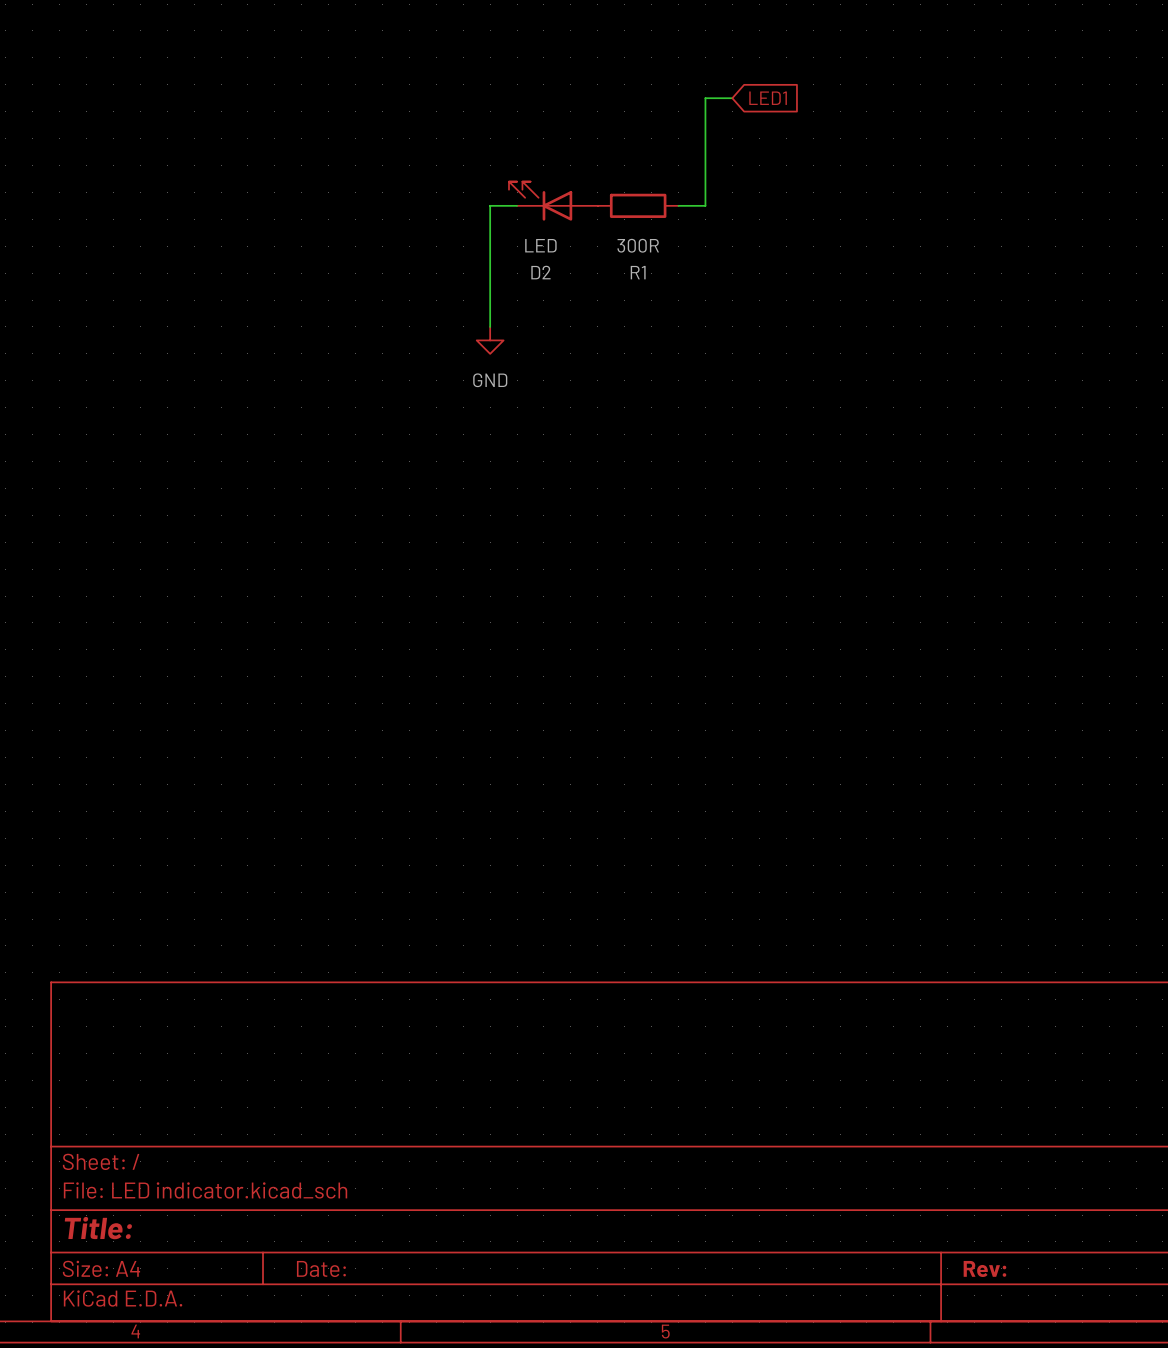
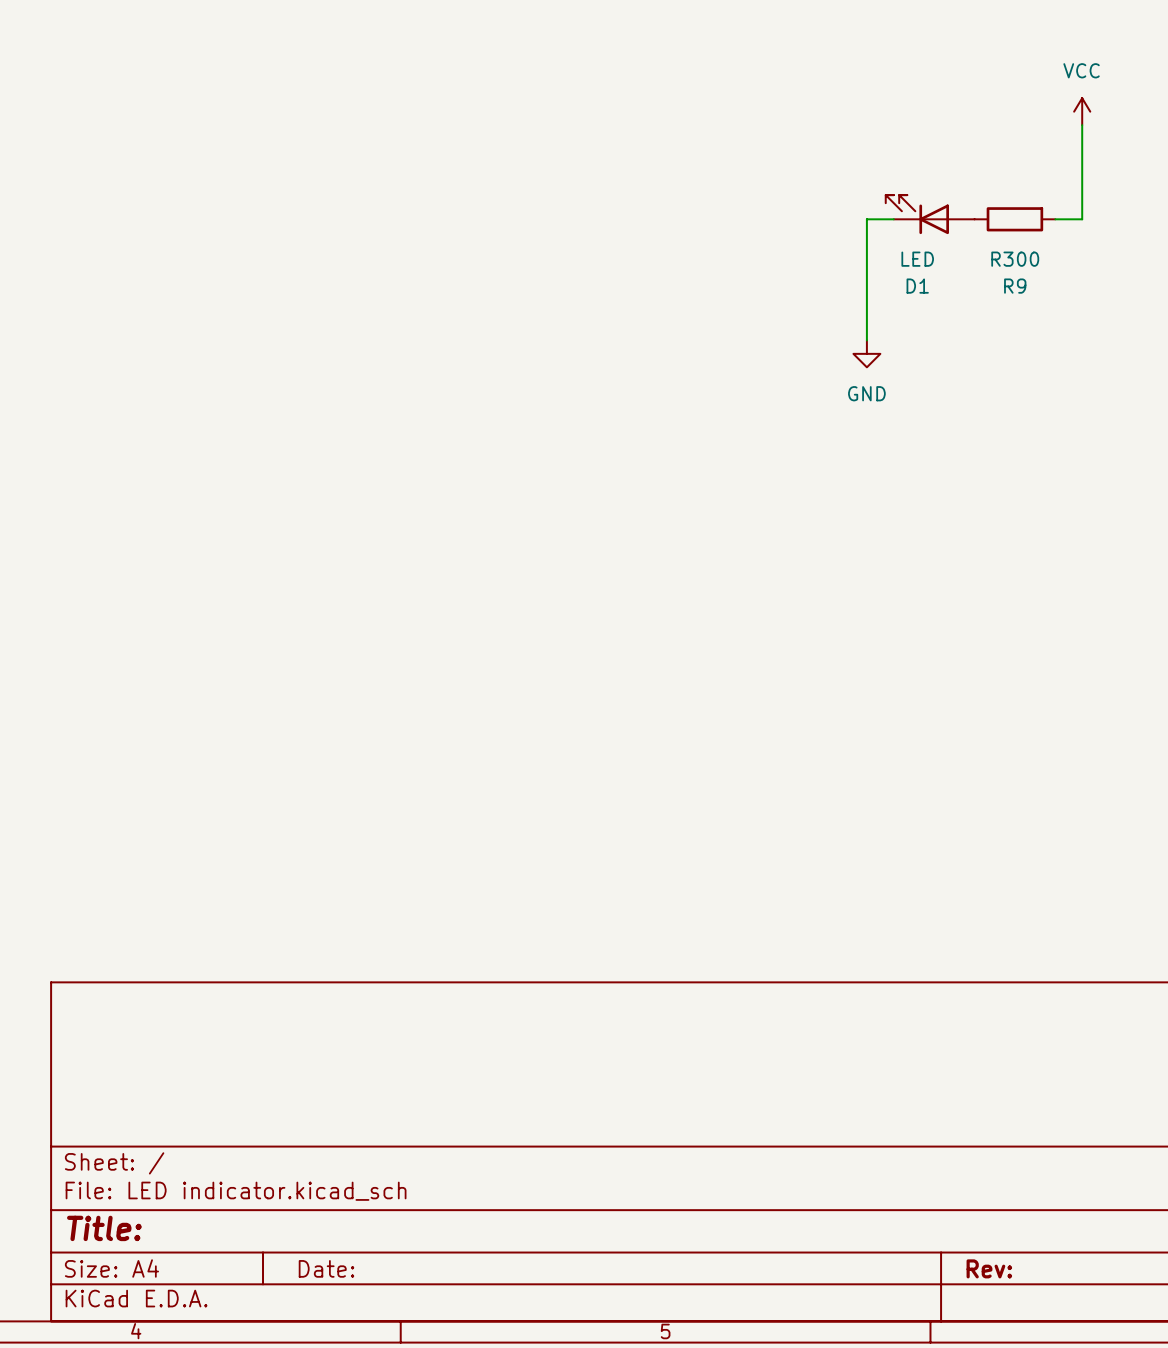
wire: (732, 98) (705, 98) (705, 205) (678, 205) -> none
global label: LED1 (768, 98) -> none
power symbol: none -> VCC (1082, 111)
wire: none -> (1082, 125) (1082, 219) (1055, 219)
D2: LED (553, 201) -> none
wire: (517, 205) (490, 205) (490, 326) -> none
R1: 300R (638, 205) -> none
D1: none -> LED (930, 214)
wire: none -> (893, 219) (866, 219) (866, 340)
R9: none -> R300 (1014, 219)
power symbol: GND (490, 340) -> none
power symbol: none -> GND (866, 353)

